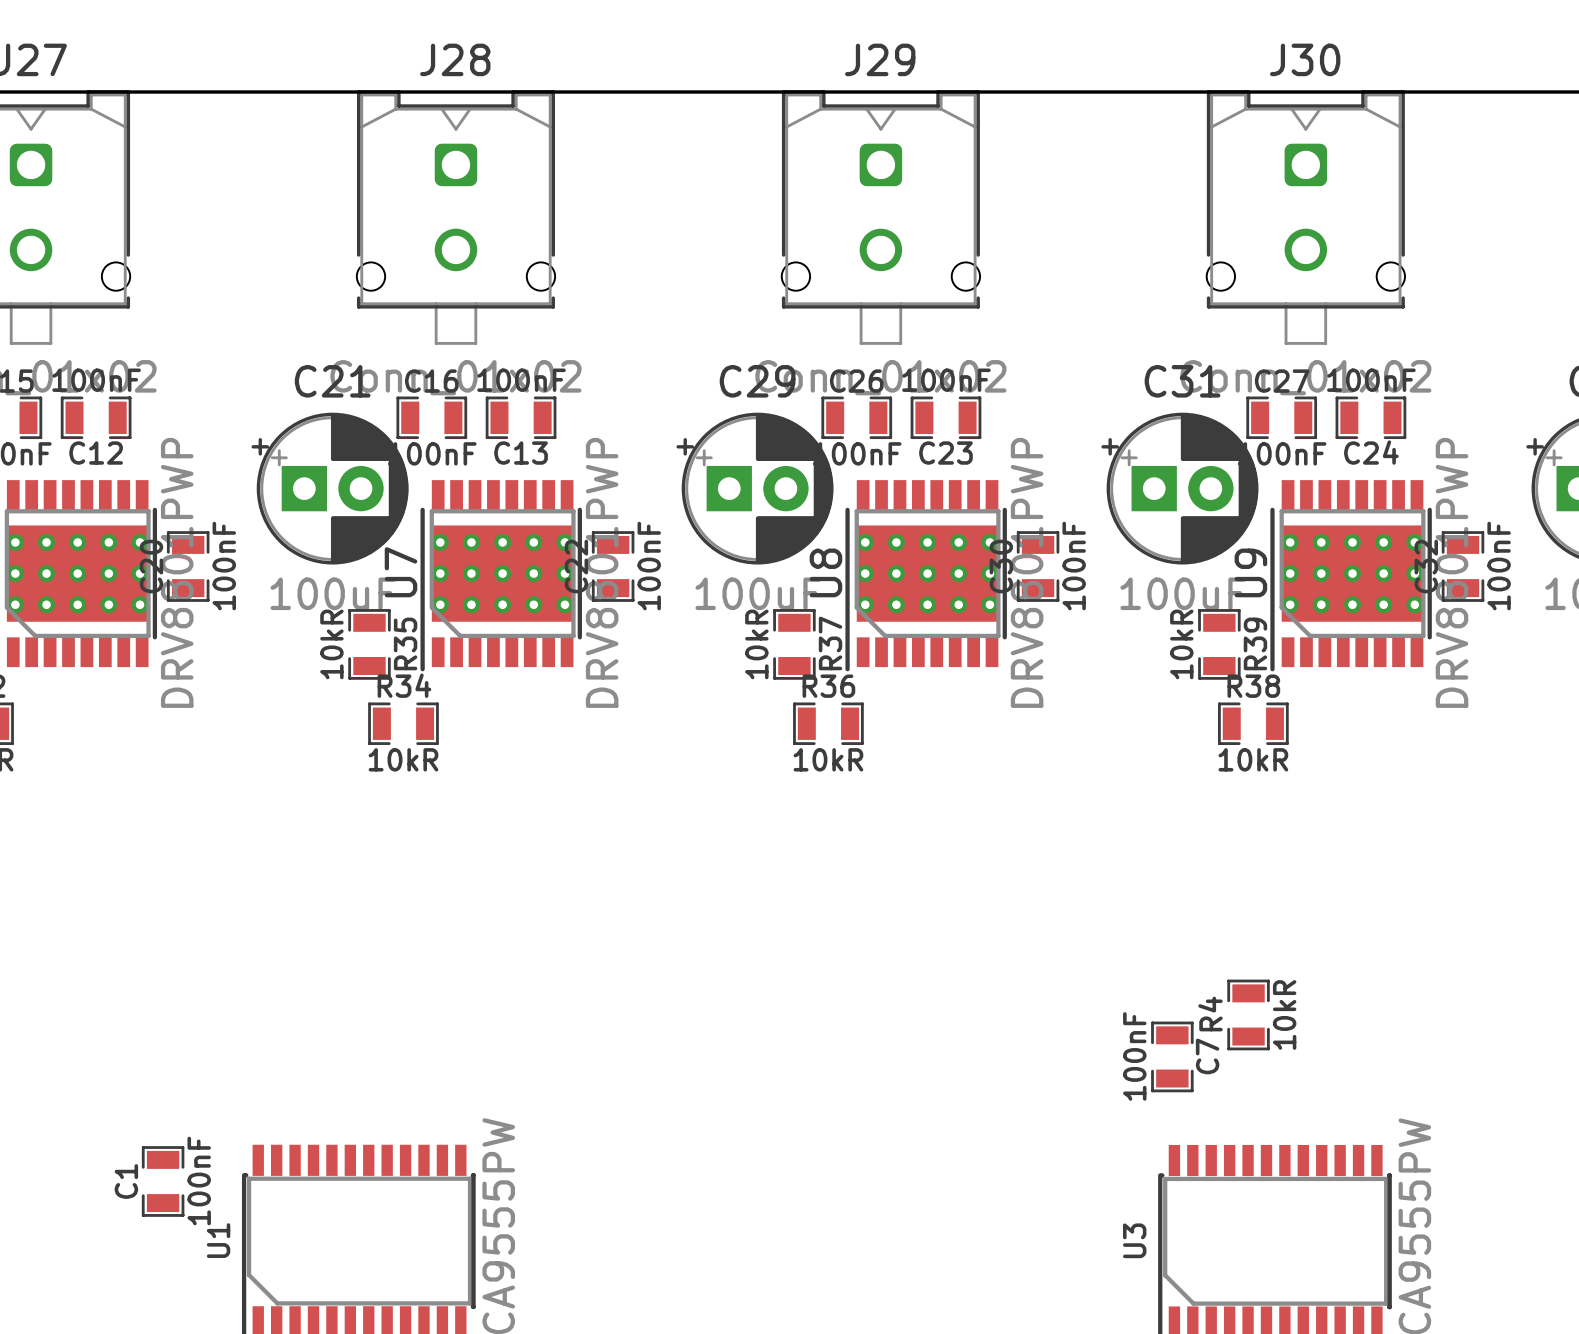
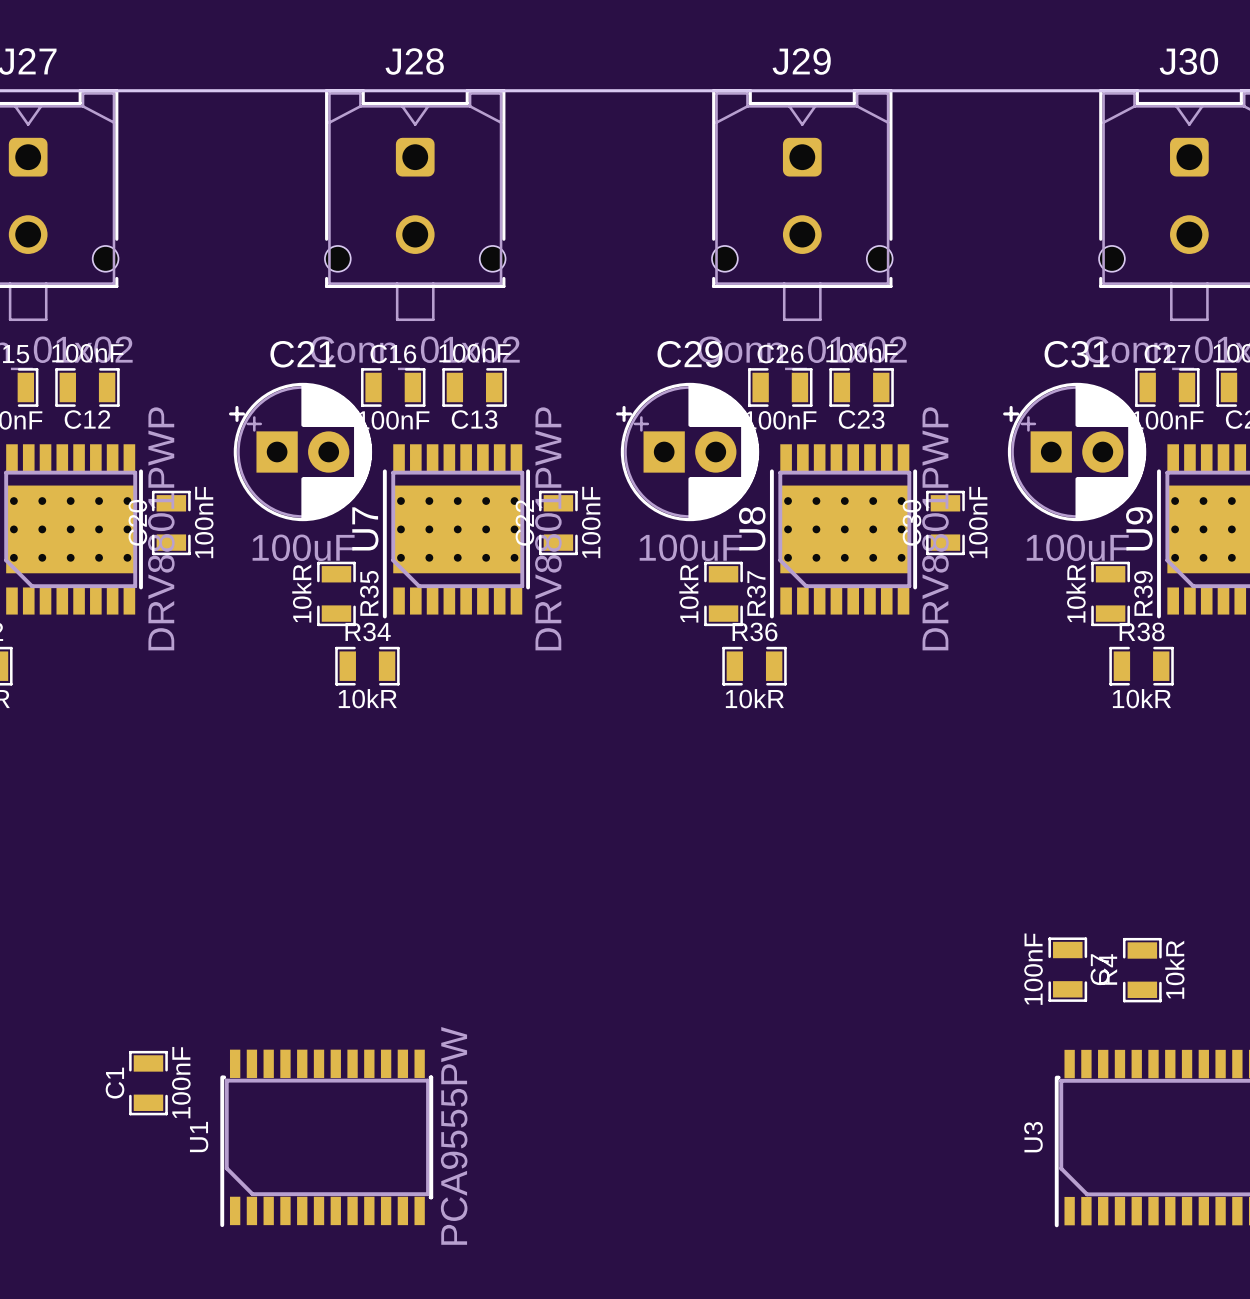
R4 position: (1248, 1014) -> (1142, 970)

